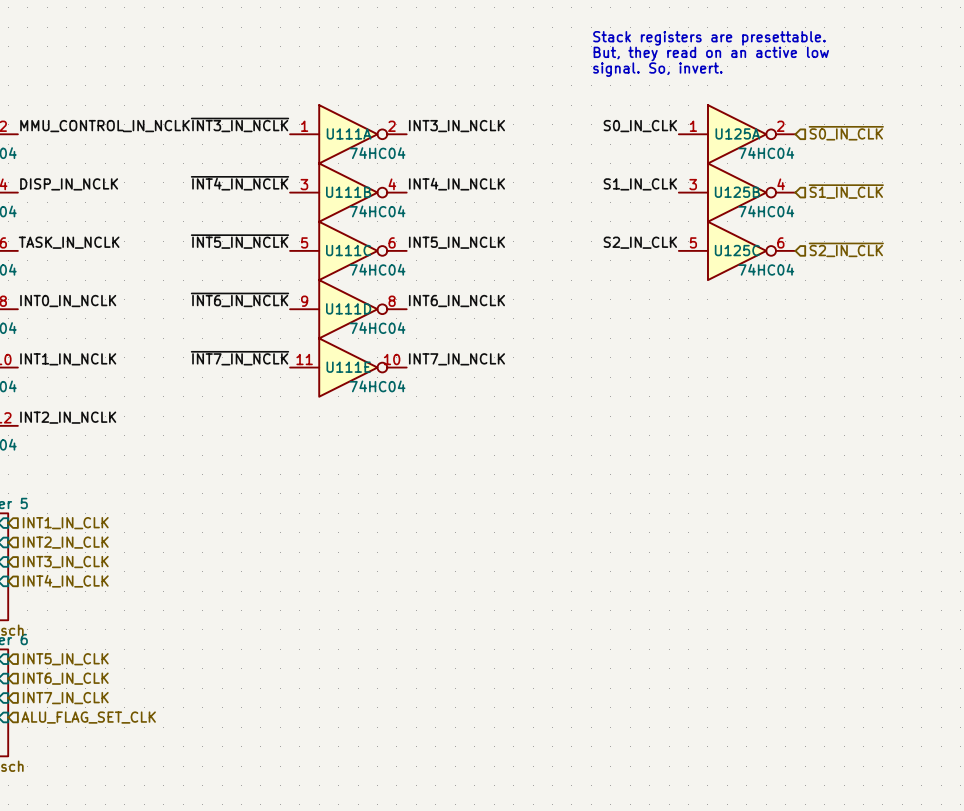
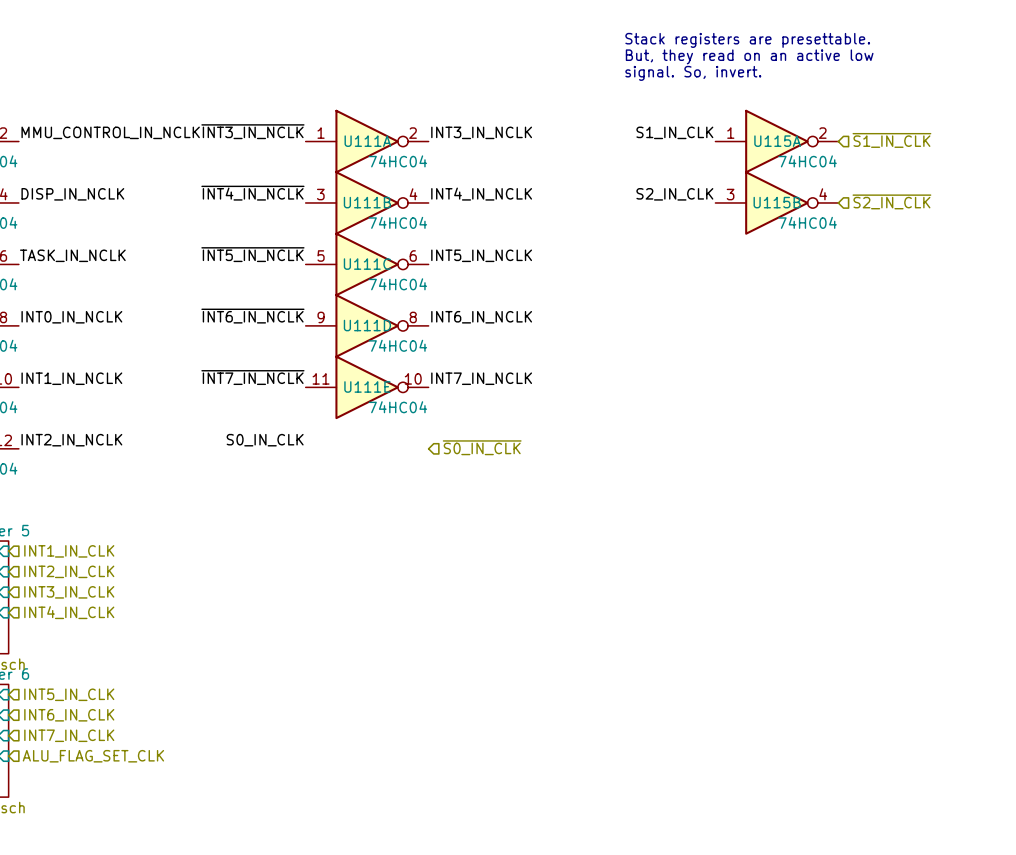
label: S0_IN_CLK (640, 126) -> S1_IN_CLK (674, 132)
U125A name: U125A (737, 133) -> U115A (777, 141)
hierarchical label: ~{S0_IN_CLK} (846, 133) -> ~{S1_IN_CLK} (891, 140)
label: S1_IN_CLK (640, 184) -> S2_IN_CLK (674, 194)
hierarchical label: ~{S1_IN_CLK} (846, 191) -> ~{S2_IN_CLK} (891, 201)
U125B name: U125B (737, 192) -> U115B (777, 202)
label: S2_IN_CLK (640, 242) -> none
hierarchical label: ~{S2_IN_CLK} (846, 249) -> none
U125C: 74HC04 (737, 250) -> none
label: none -> S0_IN_CLK (265, 440)
hierarchical label: none -> ~{S0_IN_CLK} (482, 447)

